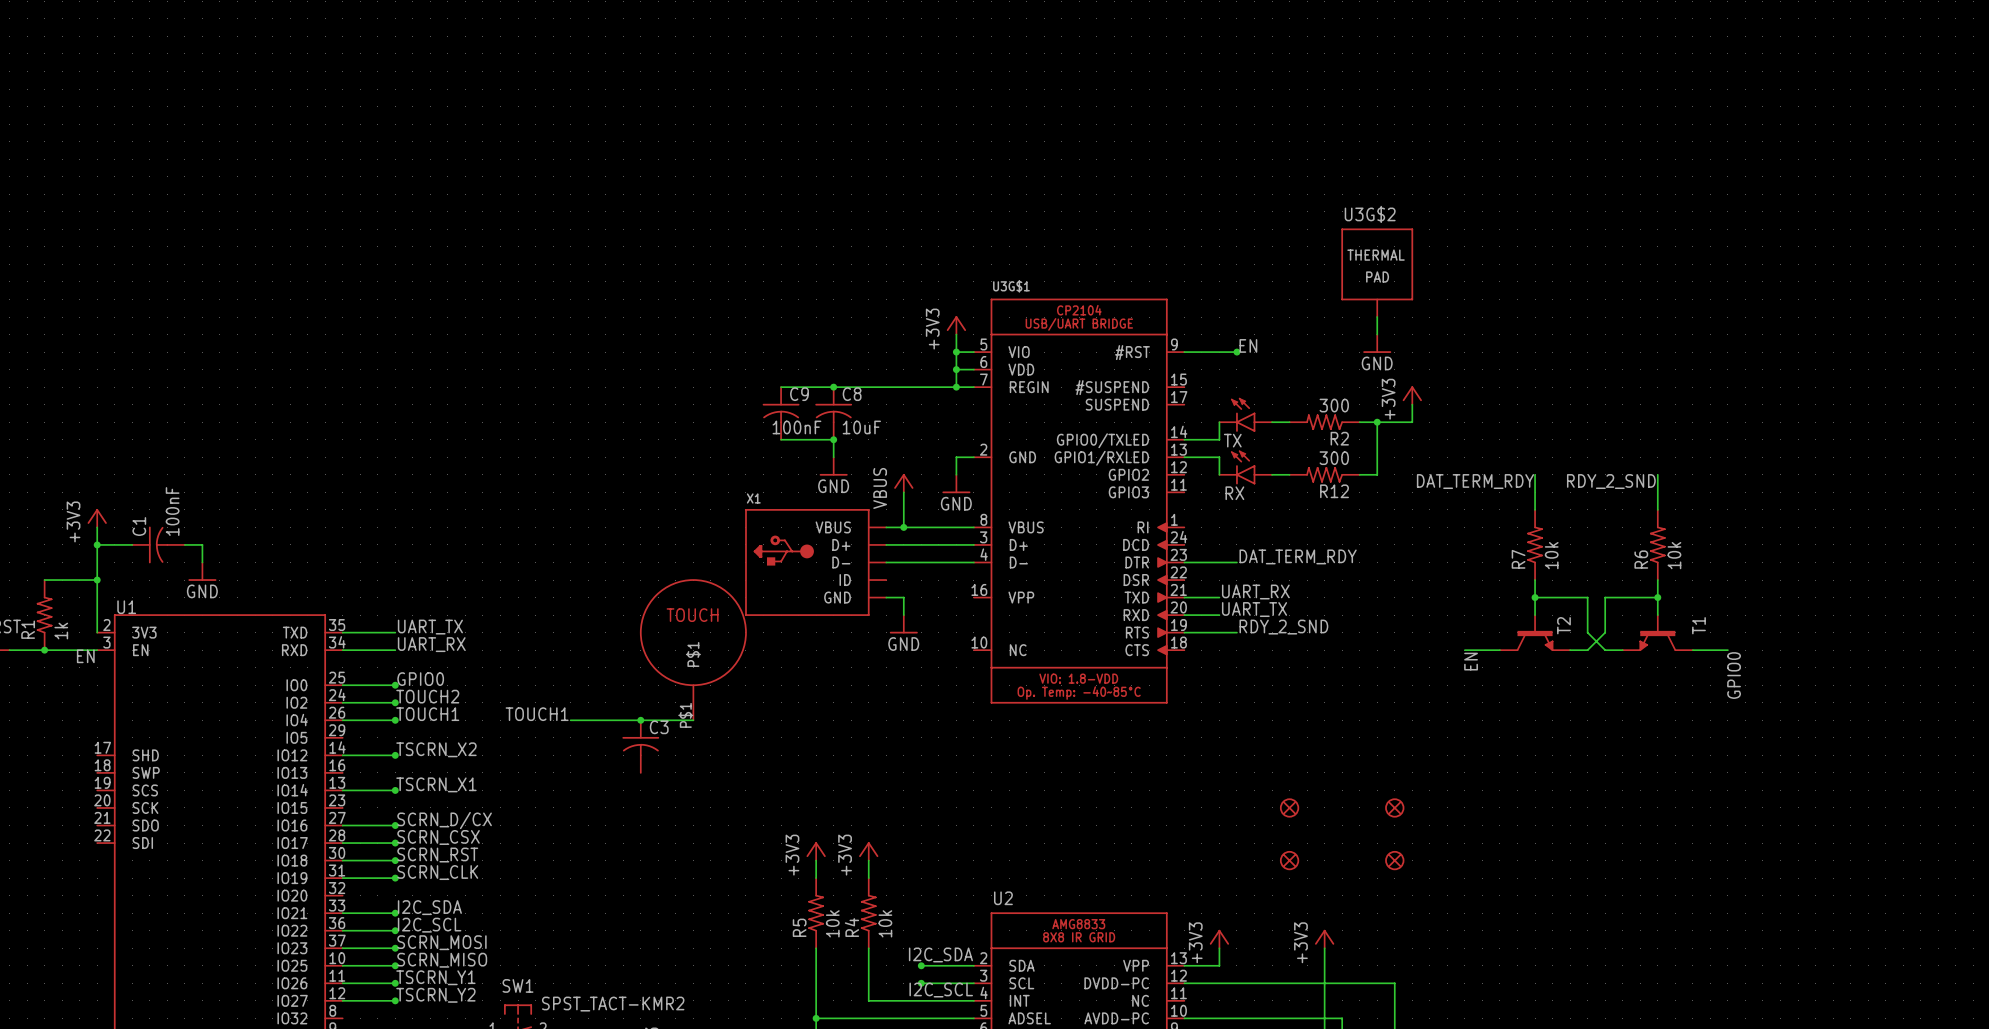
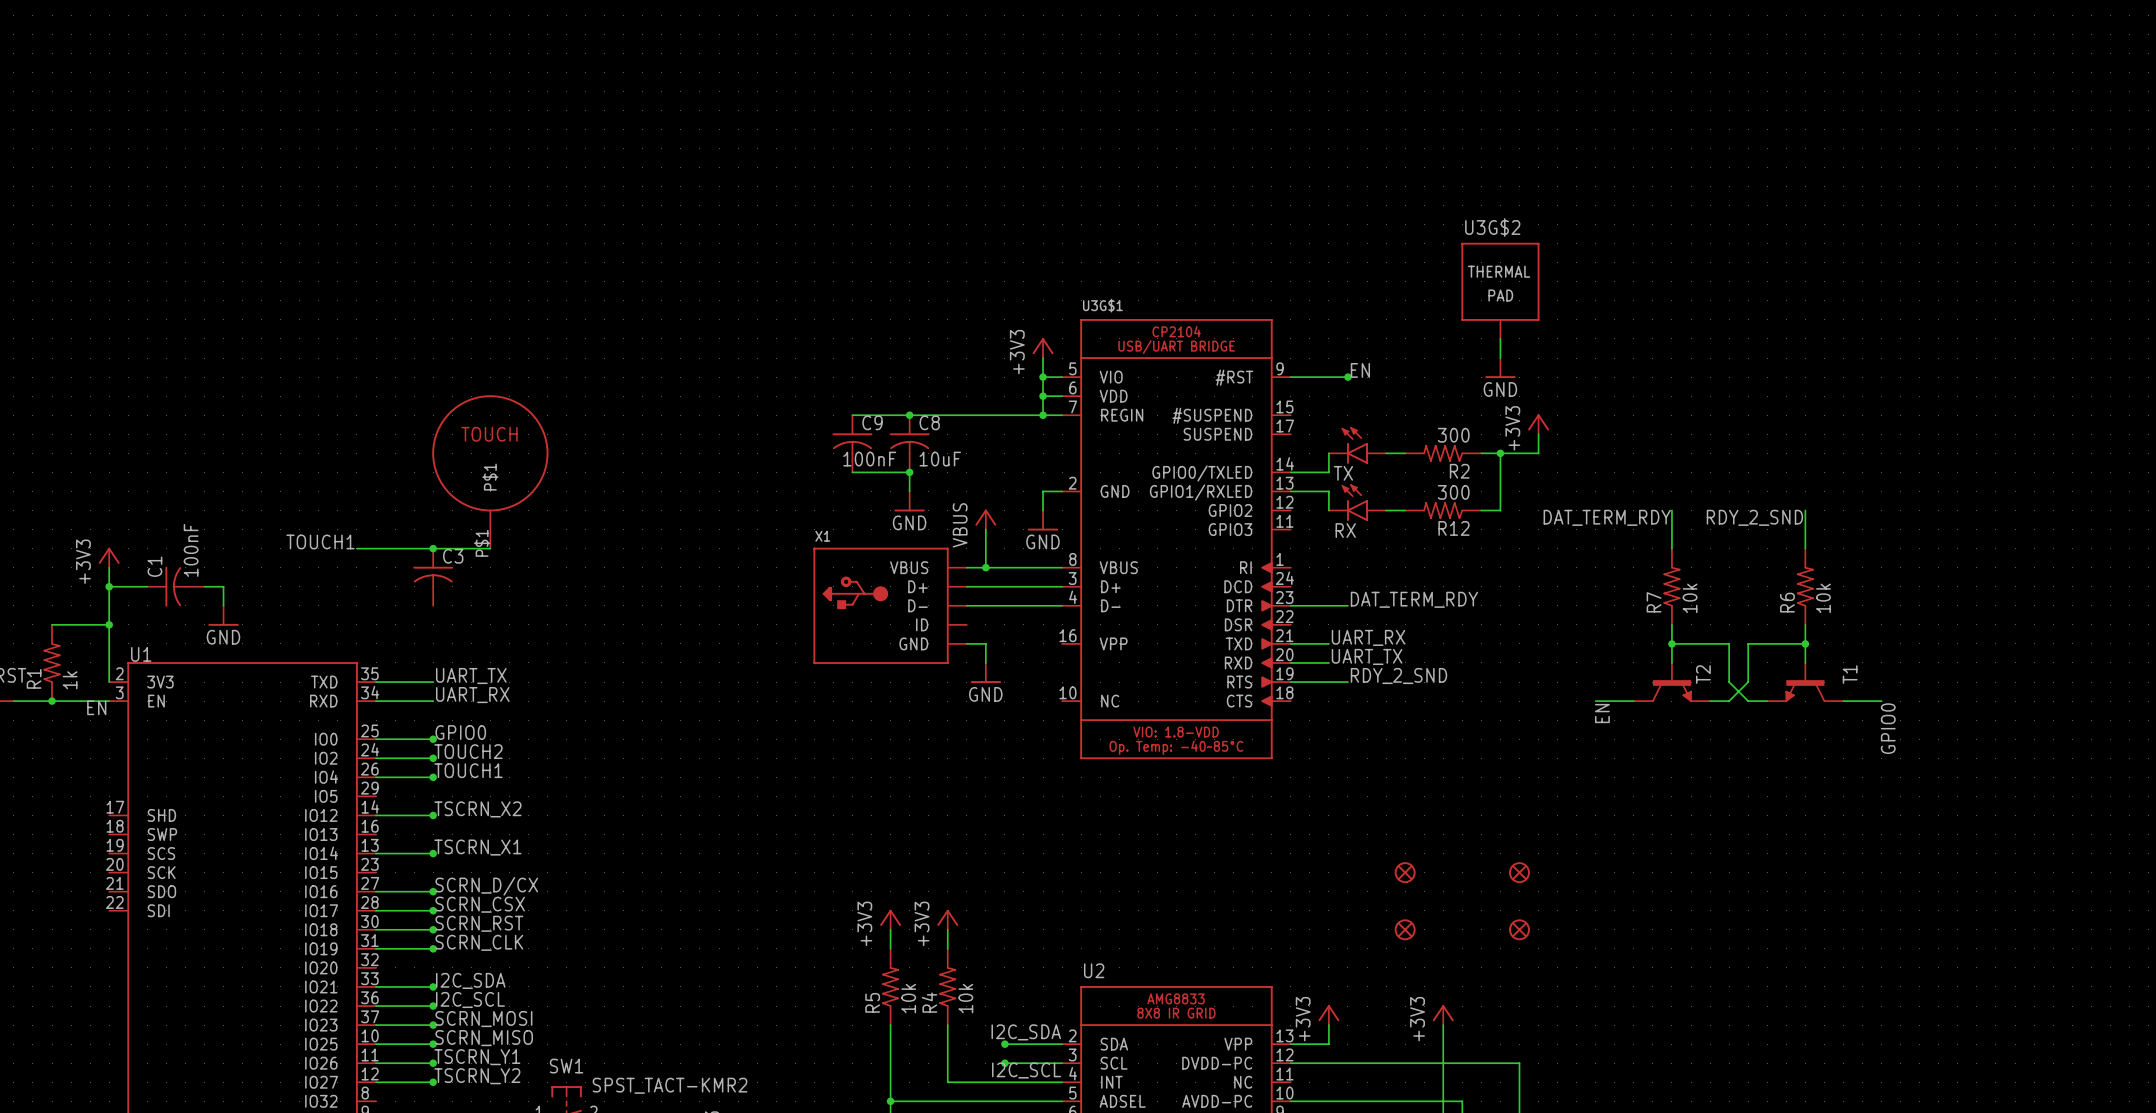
TOUCH: none -> (490, 471)
label: none -> TOUCH1 (320, 541)
wire: none -> (356, 548) (490, 548)
junction: none -> (433, 548)
TOUCH: (693, 649) -> none
label: TOUCH1 (537, 714) -> none
wire: (570, 720) (693, 720) -> none
junction: (640, 720) -> none
C3 position: (640, 746) -> (433, 577)

